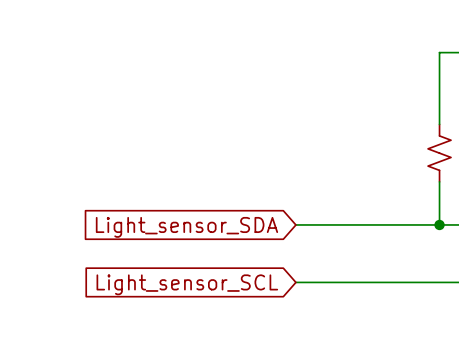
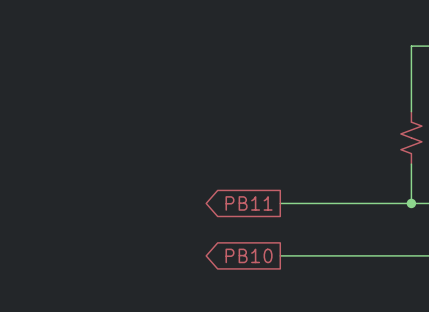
global label shape: input (186, 227) -> output (249, 203)
global label: Light_sensor_SDA (186, 227) -> PB11 (249, 203)
global label shape: input (187, 284) -> output (249, 255)
global label: Light_sensor_SCL (187, 284) -> PB10 (249, 255)

